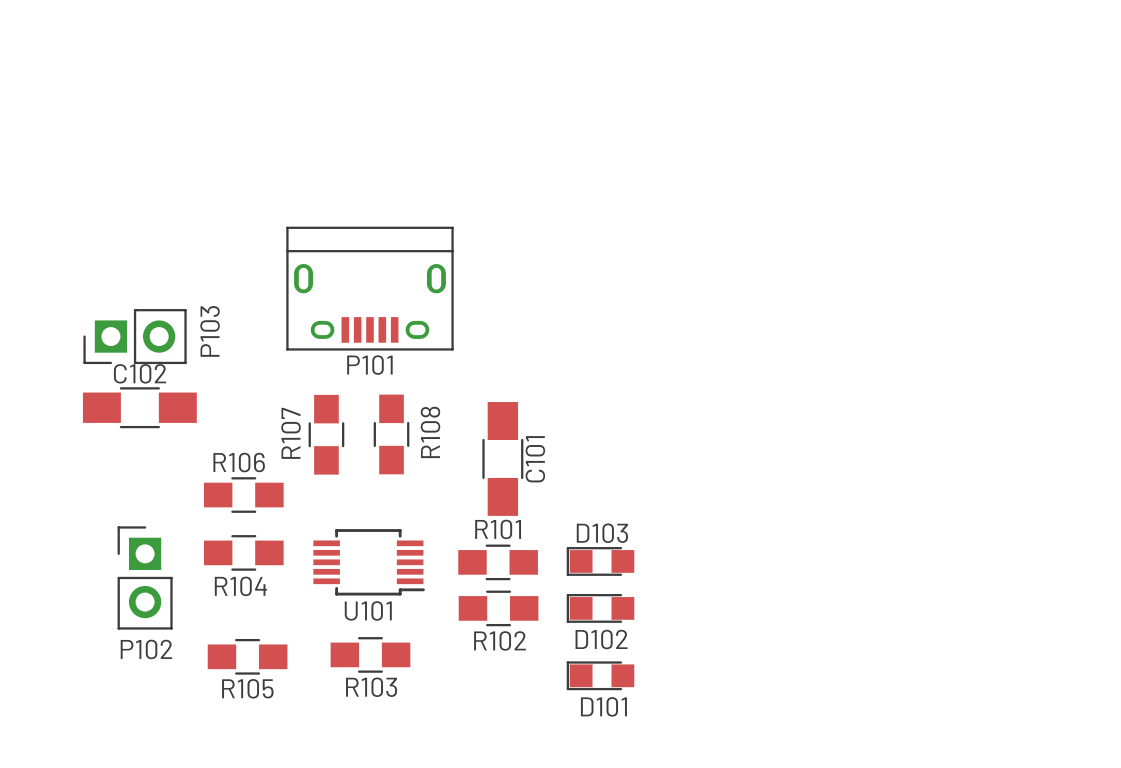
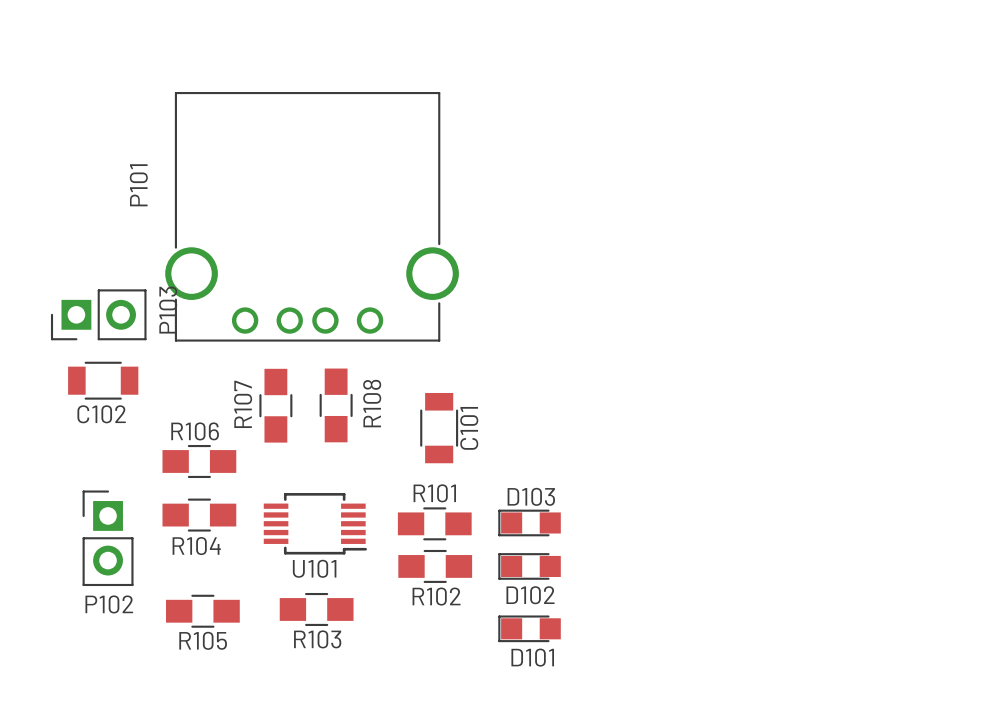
P101 footprint: [286, 226, 454, 351] -> [165, 91, 459, 342]
P101 name position: P101 (369, 365) -> P101 (138, 185)
C102 name position: C102 (140, 373) -> C102 (101, 414)
C102 footprint: [82, 387, 197, 429] -> [68, 361, 139, 400]
C101 footprint: [482, 402, 524, 516] -> [420, 392, 459, 464]

